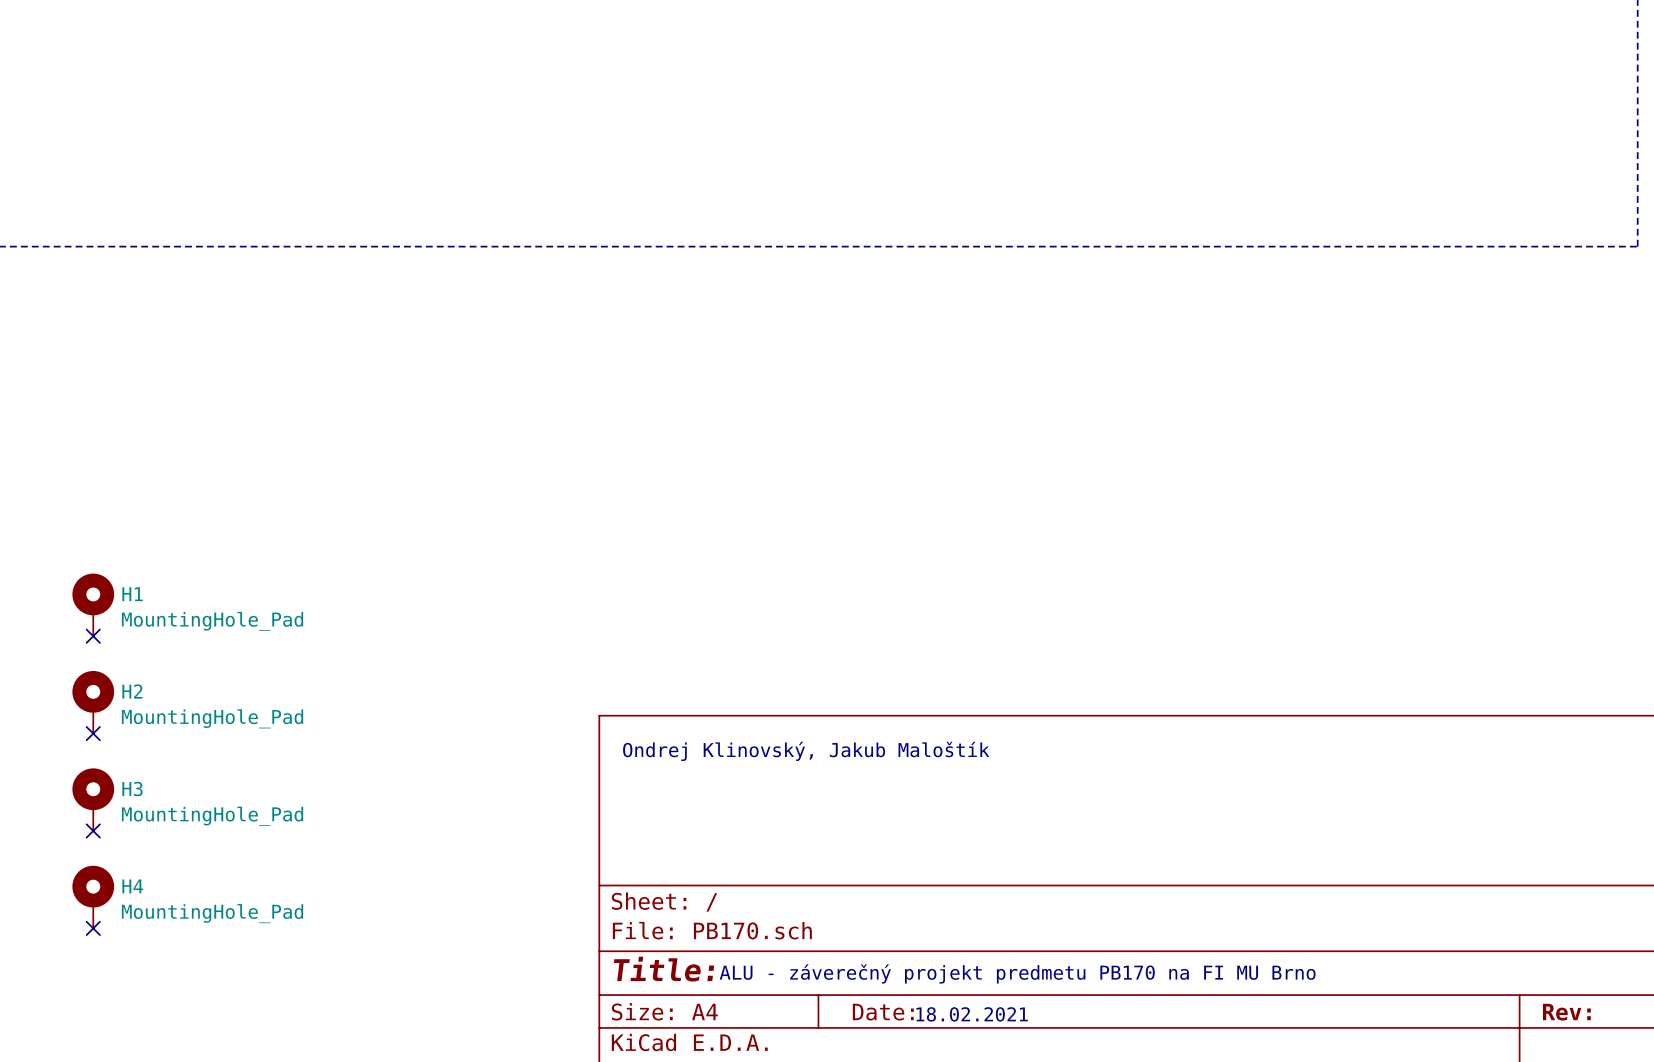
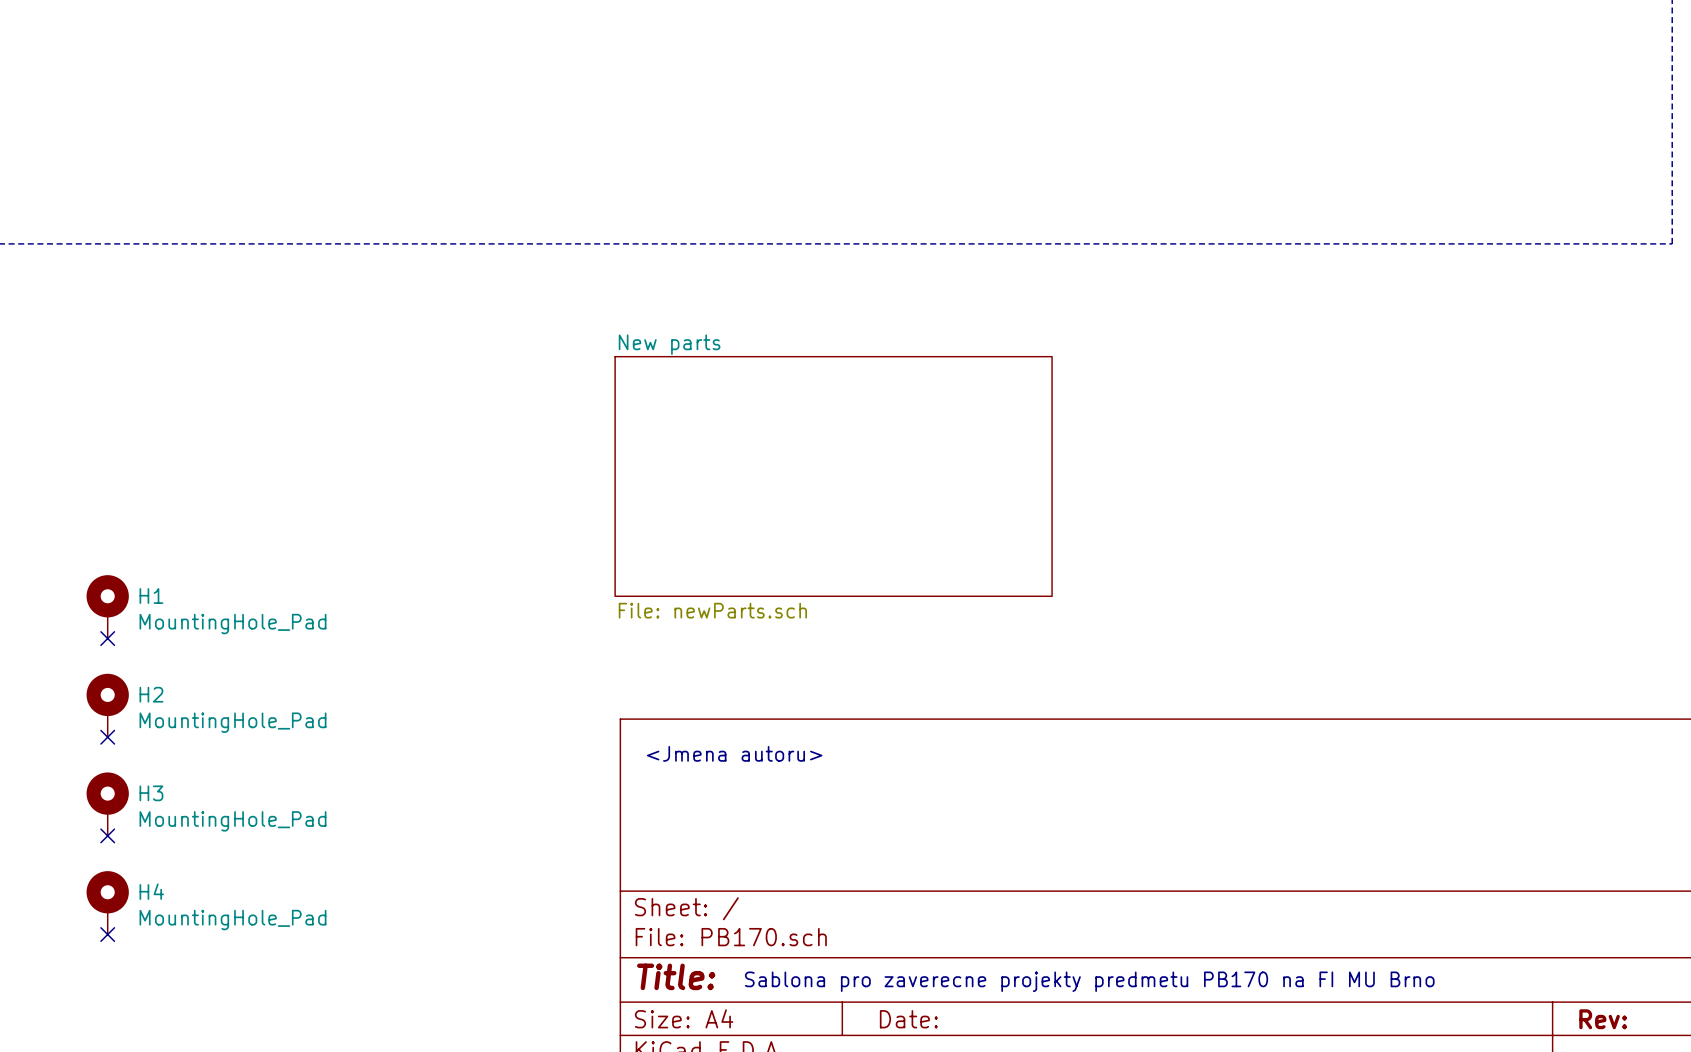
sheet New parts: none -> File: newParts.sch (833, 476)
text: Ondrej Klinovský, Jakub Maloštík (806, 751) -> <Jmena autoru> (734, 753)
text: ALU - záverečný projekt predmetu PB170 na FI MU Brno (1017, 973) -> Sablona pro zaverecne projekty predmetu PB170 na FI MU Brno (1089, 981)
text: 18.02.2021 (972, 1014) -> none

